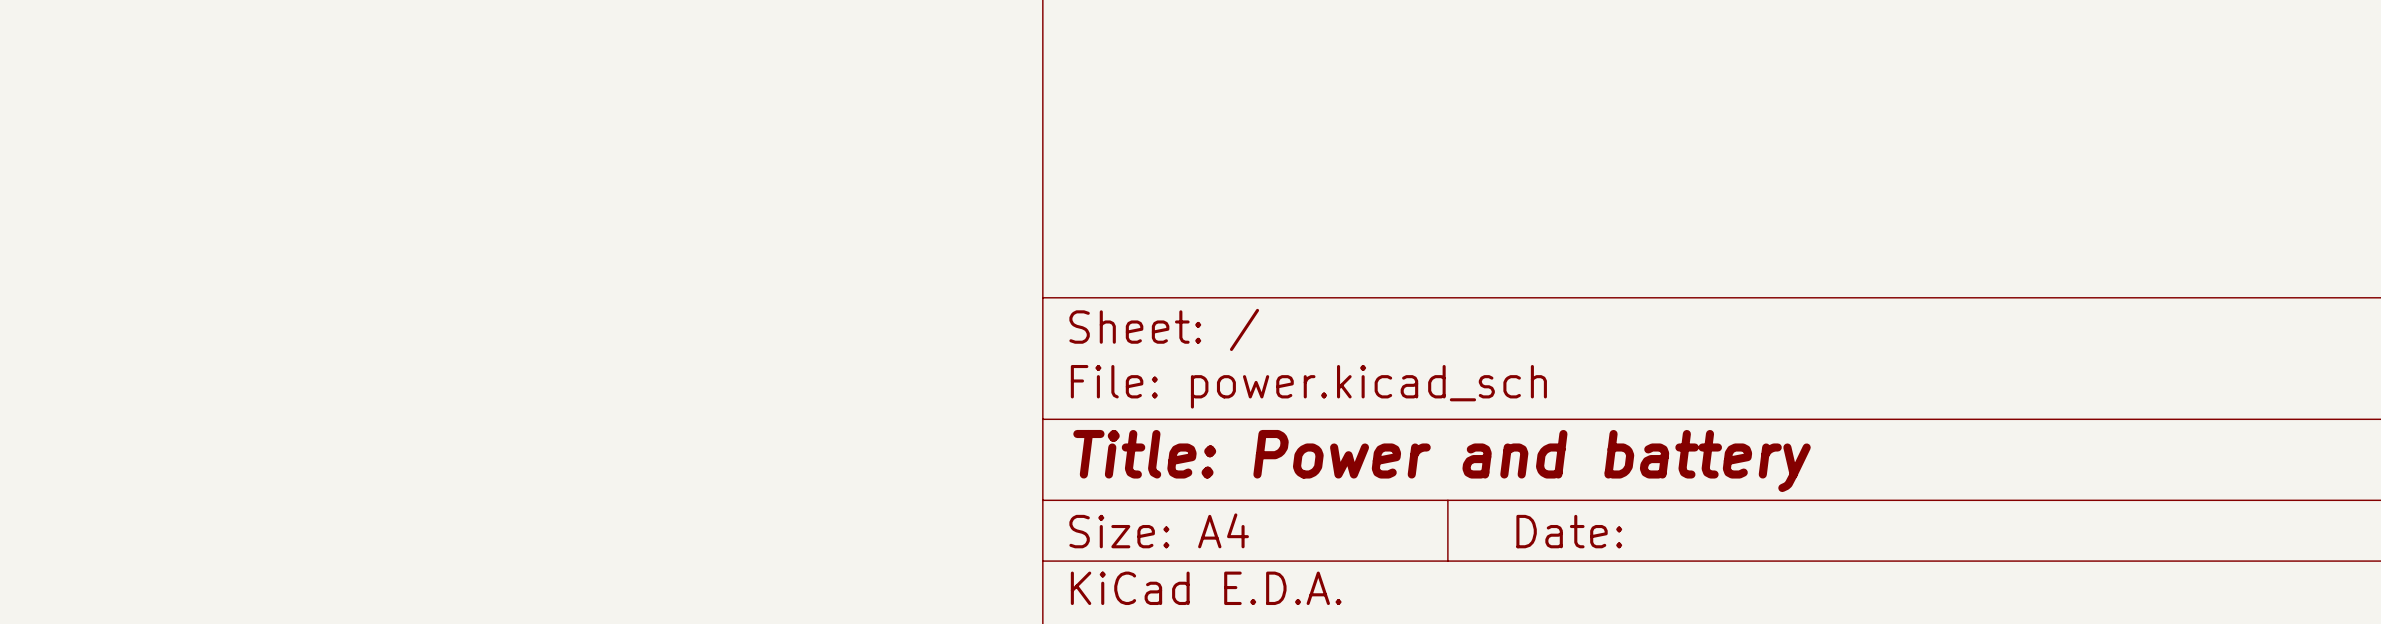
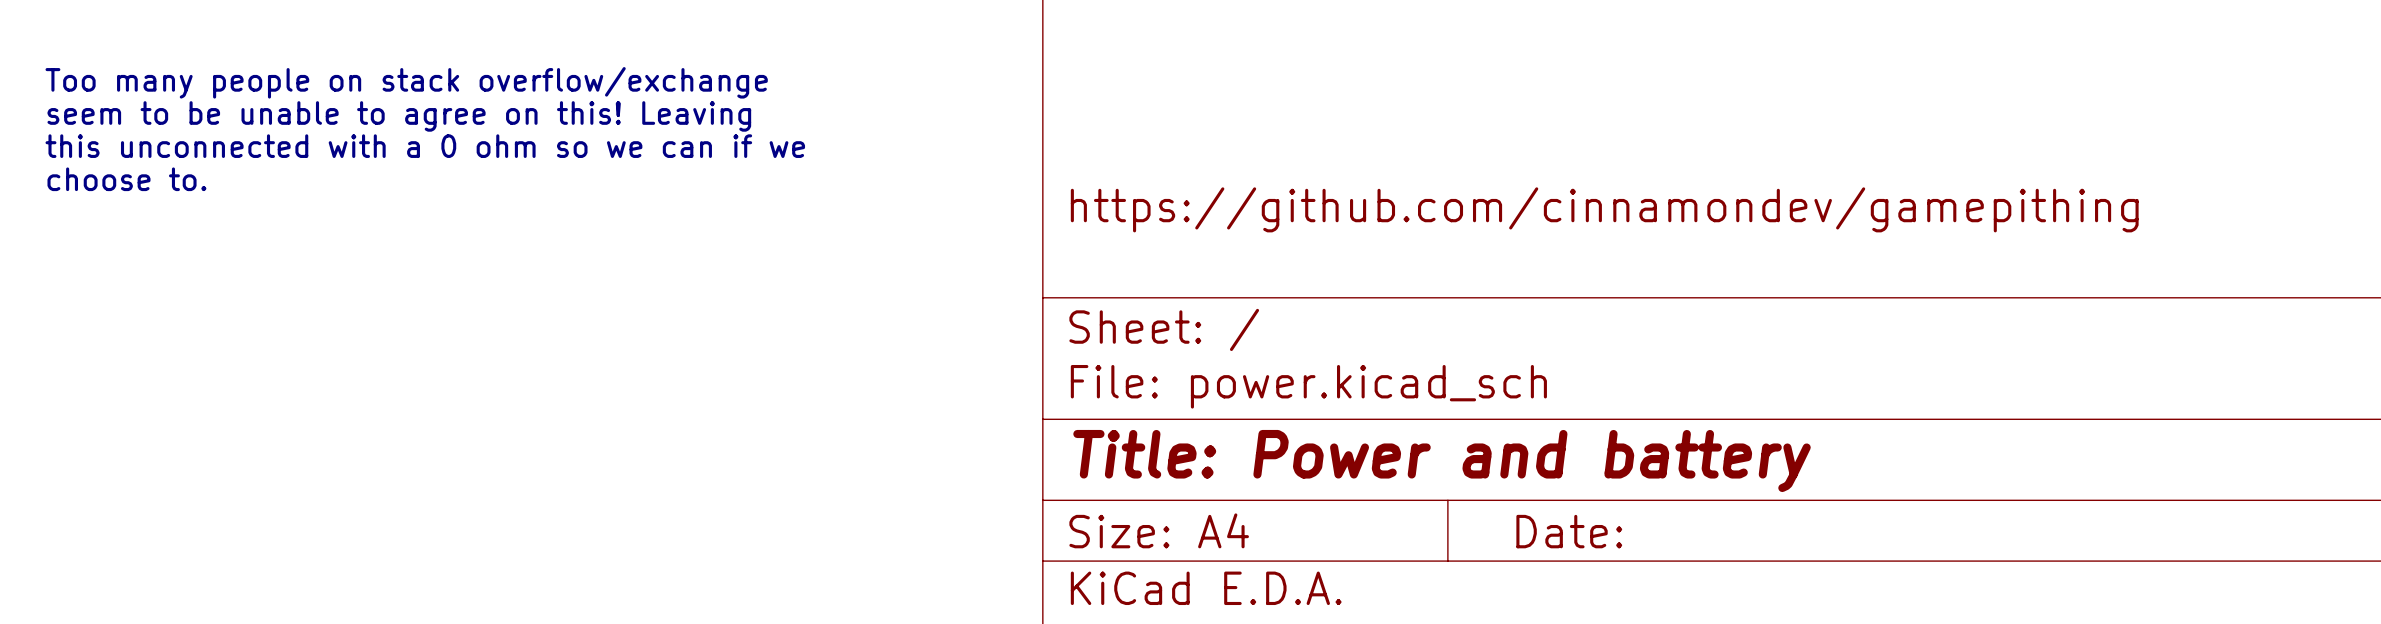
text: none -> Too many people on stack overflow/exchange (406, 82)
text: none -> seem to be unable to agree on this! Leaving (399, 116)
text: none -> this unconnected with a 0 ohm so we can if we (425, 146)
text: none -> choose to. (126, 179)
title block: none -> https://github.com/cinnamondev/gamepithing (1604, 209)

